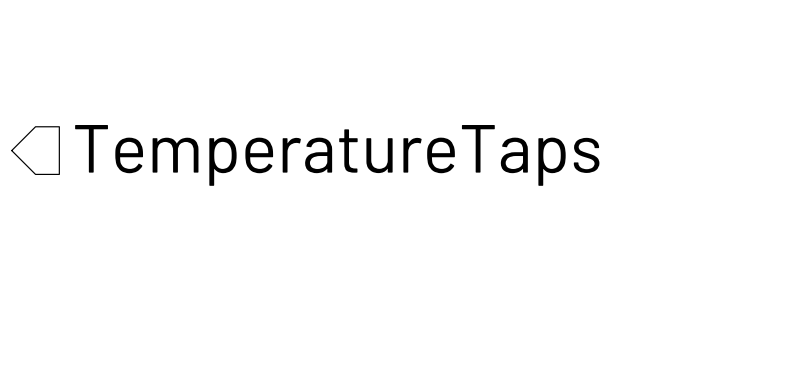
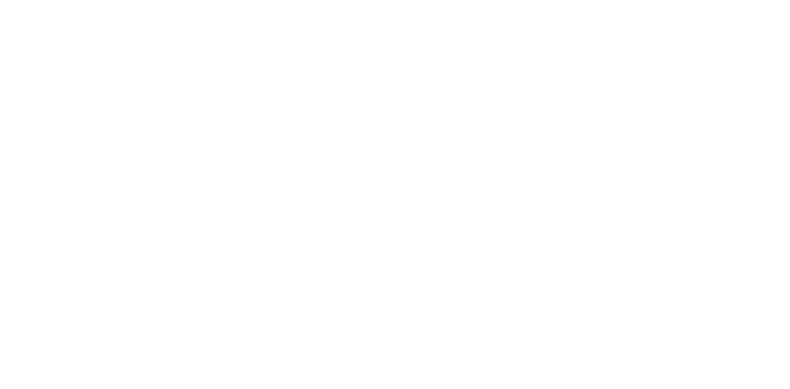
hierarchical label: TemperatureTaps (337, 155) -> none

